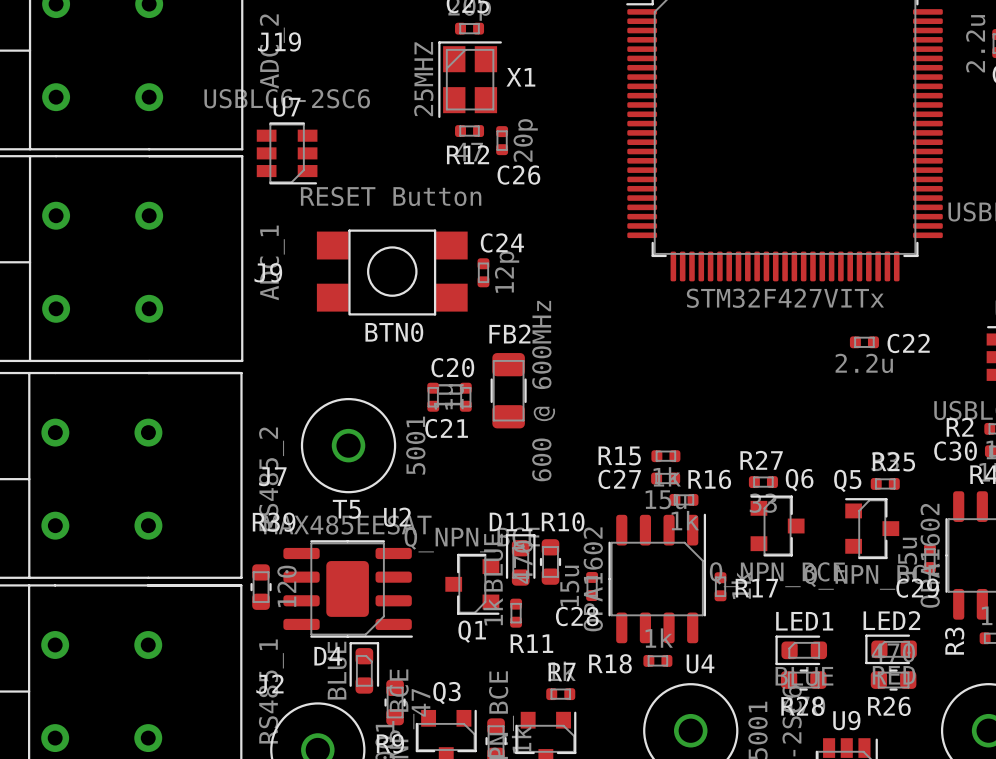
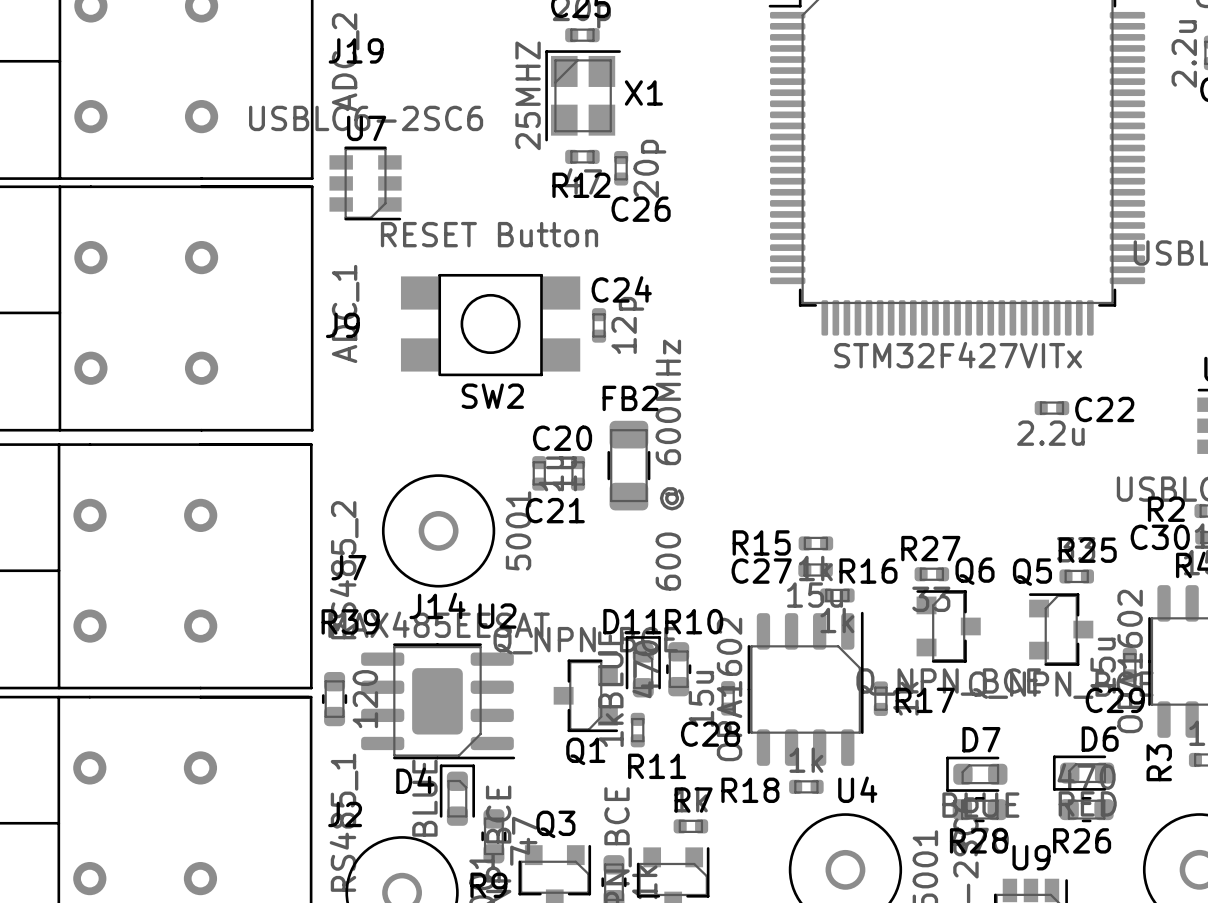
BTN0 name: BTN0 (394, 332) -> SW2 (492, 396)
T5 name: T5 (346, 509) -> J14 (437, 605)
LED2 name: LED2 (891, 620) -> D6 (1100, 739)
LED1 name: LED1 (804, 621) -> D7 (981, 739)

